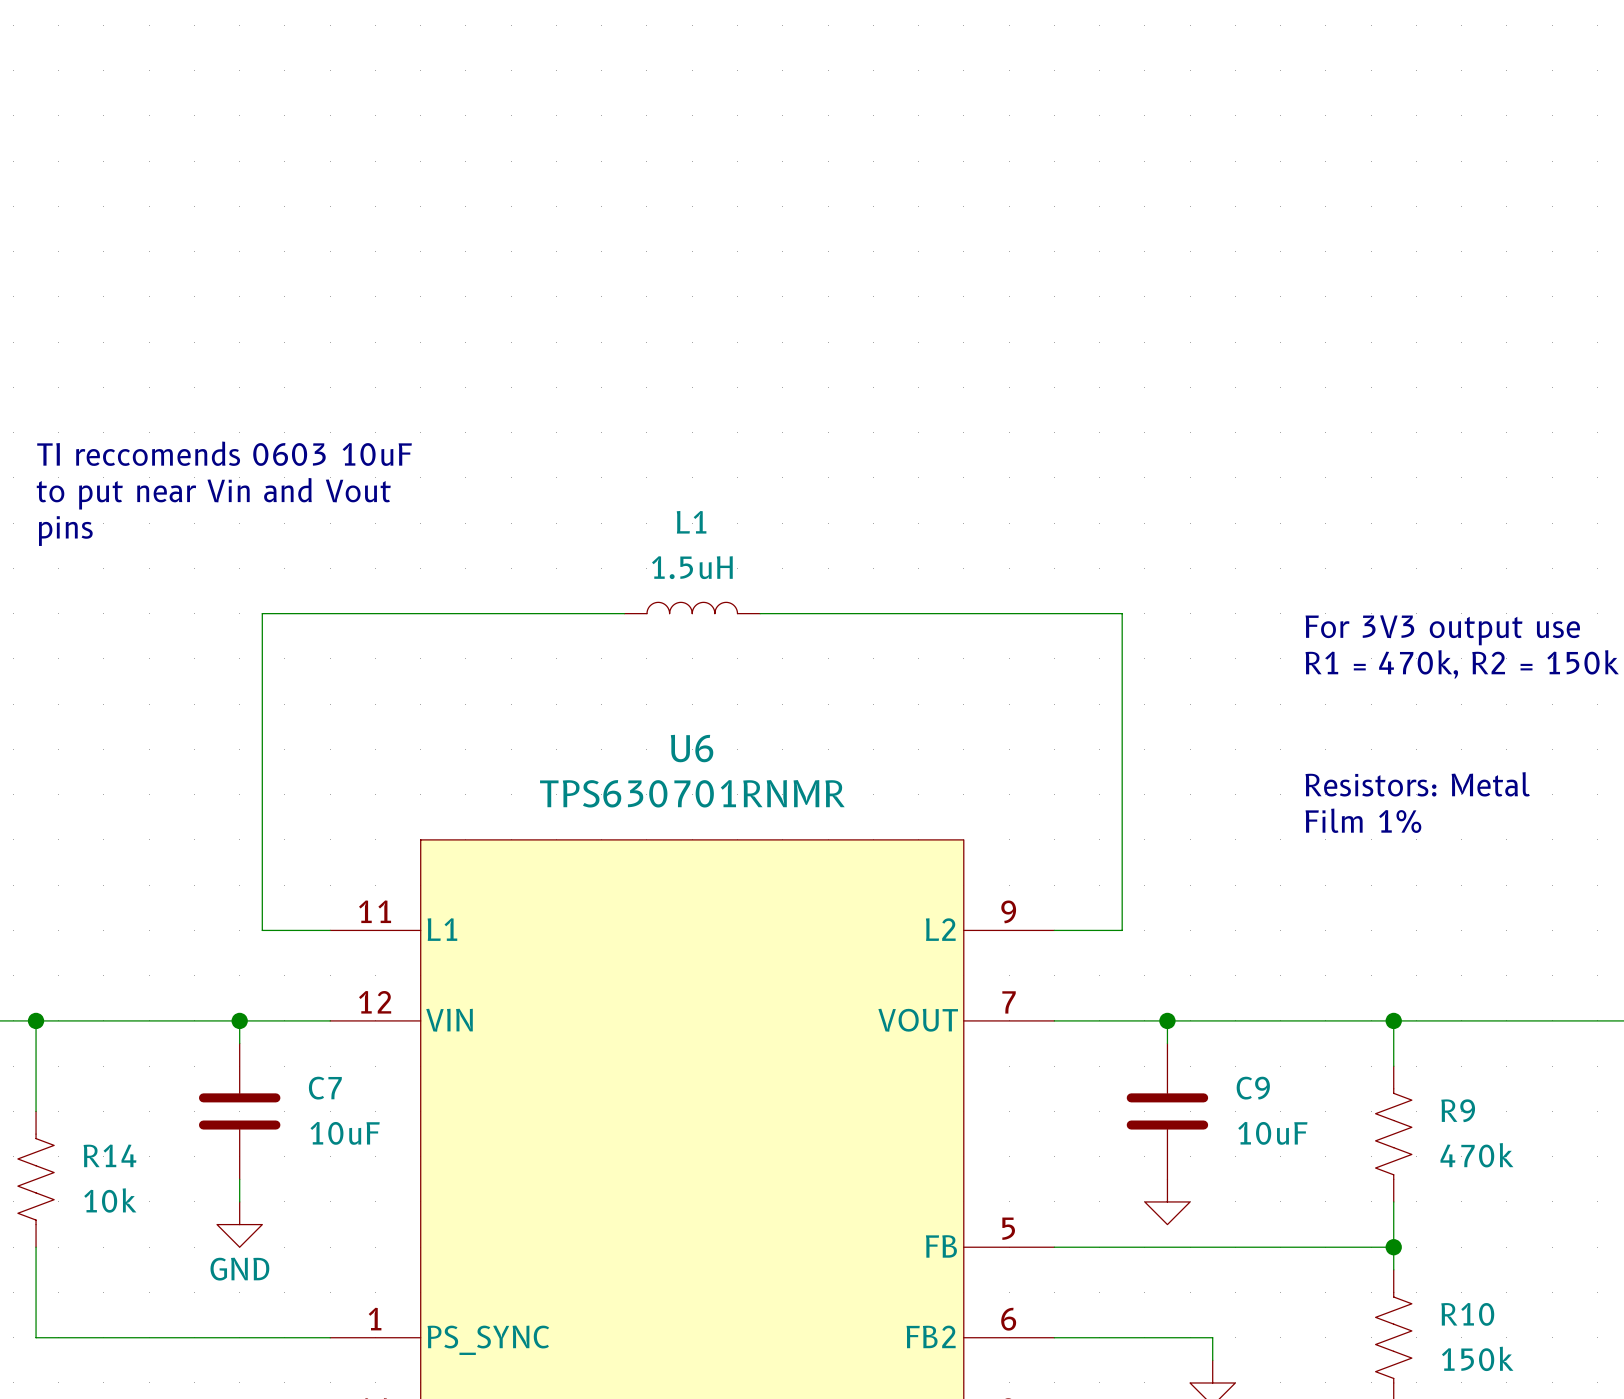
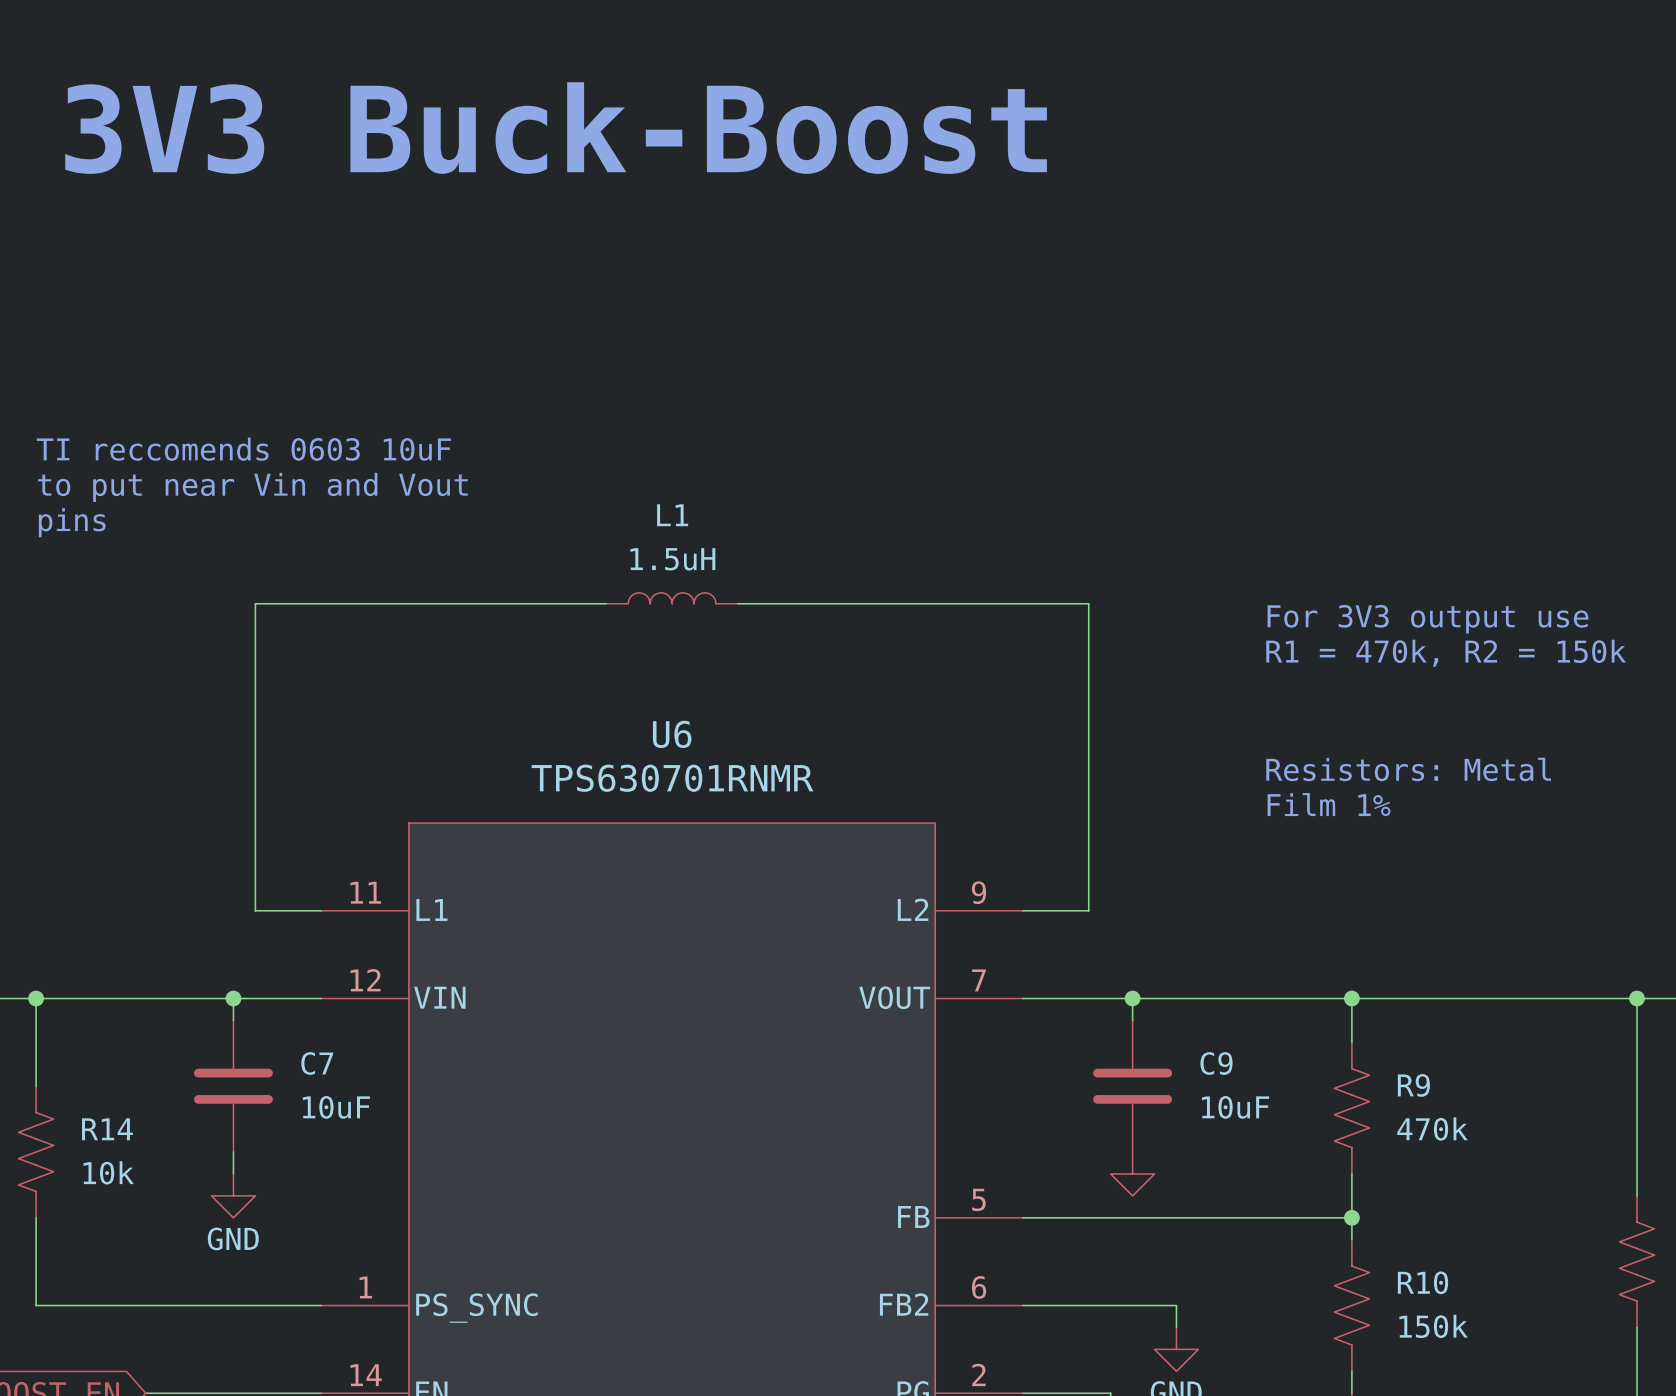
text: none -> 3V3 Buck-Boost (556, 128)

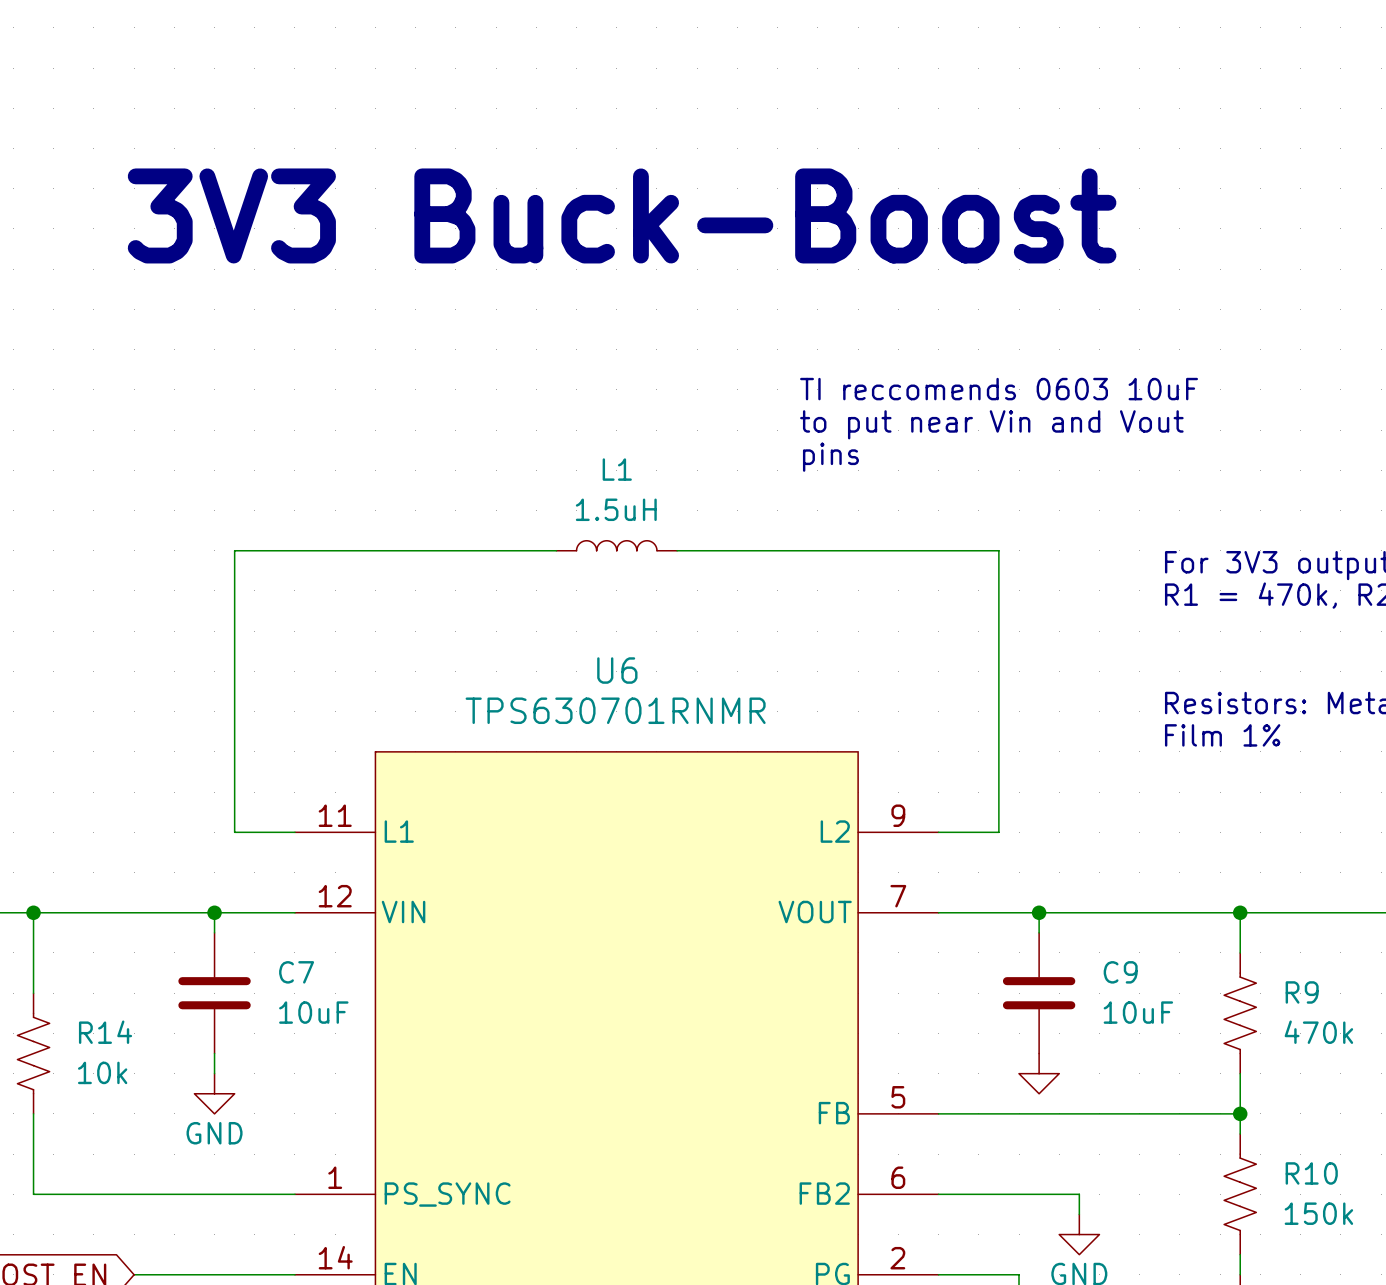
text position: 3V3 Buck-Boost (556, 128) -> 3V3 Buck-Boost (622, 215)
text: none -> TI reccomends 0603 10uF (999, 389)
text: TI reccomends 0603 10uF (243, 449) -> none
text: none -> to put near Vin and Vout (991, 424)
text: to put near Vin and Vout (252, 487) -> none
text: none -> pins (830, 457)
text: pins (72, 522) -> none

